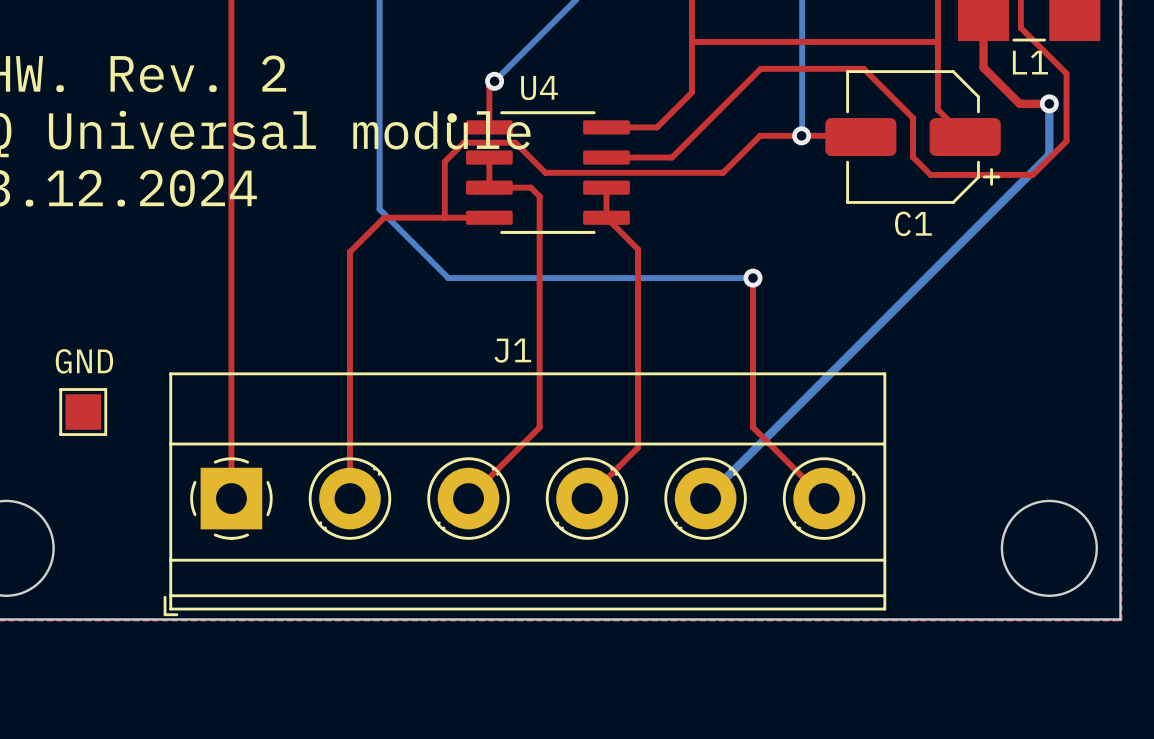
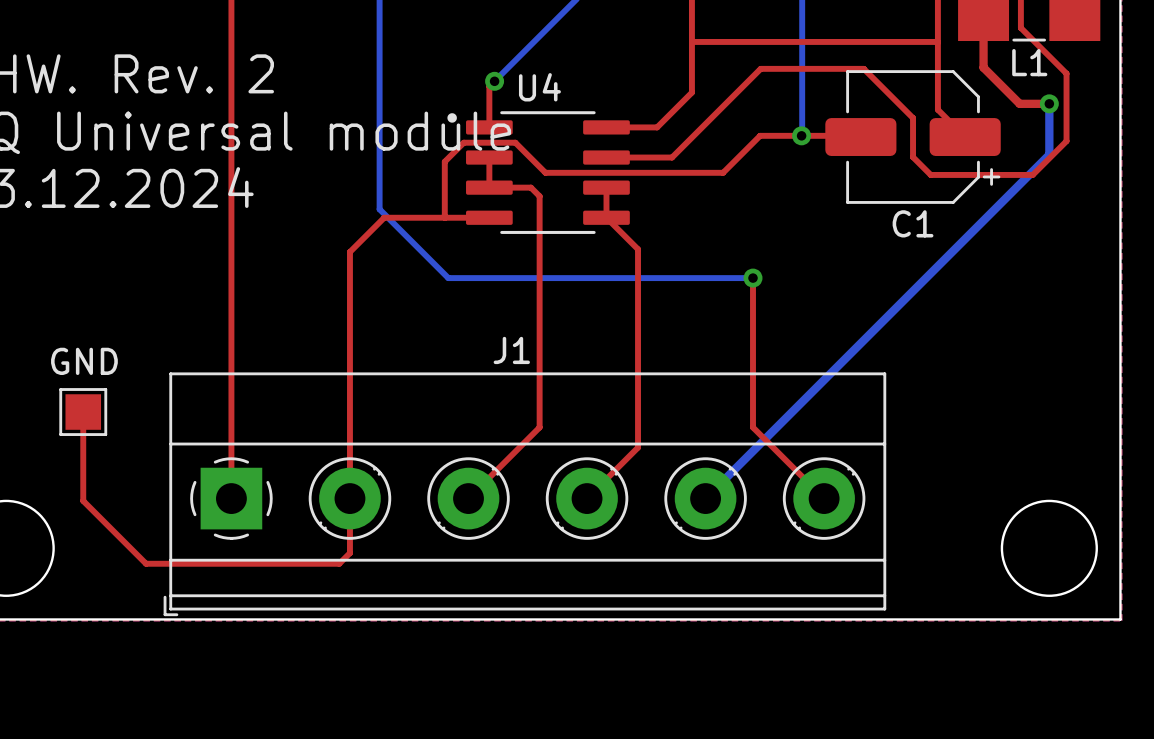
top track: none -> (83, 412) (83, 500) (146, 563) (339, 563) (349, 553) (349, 498)

